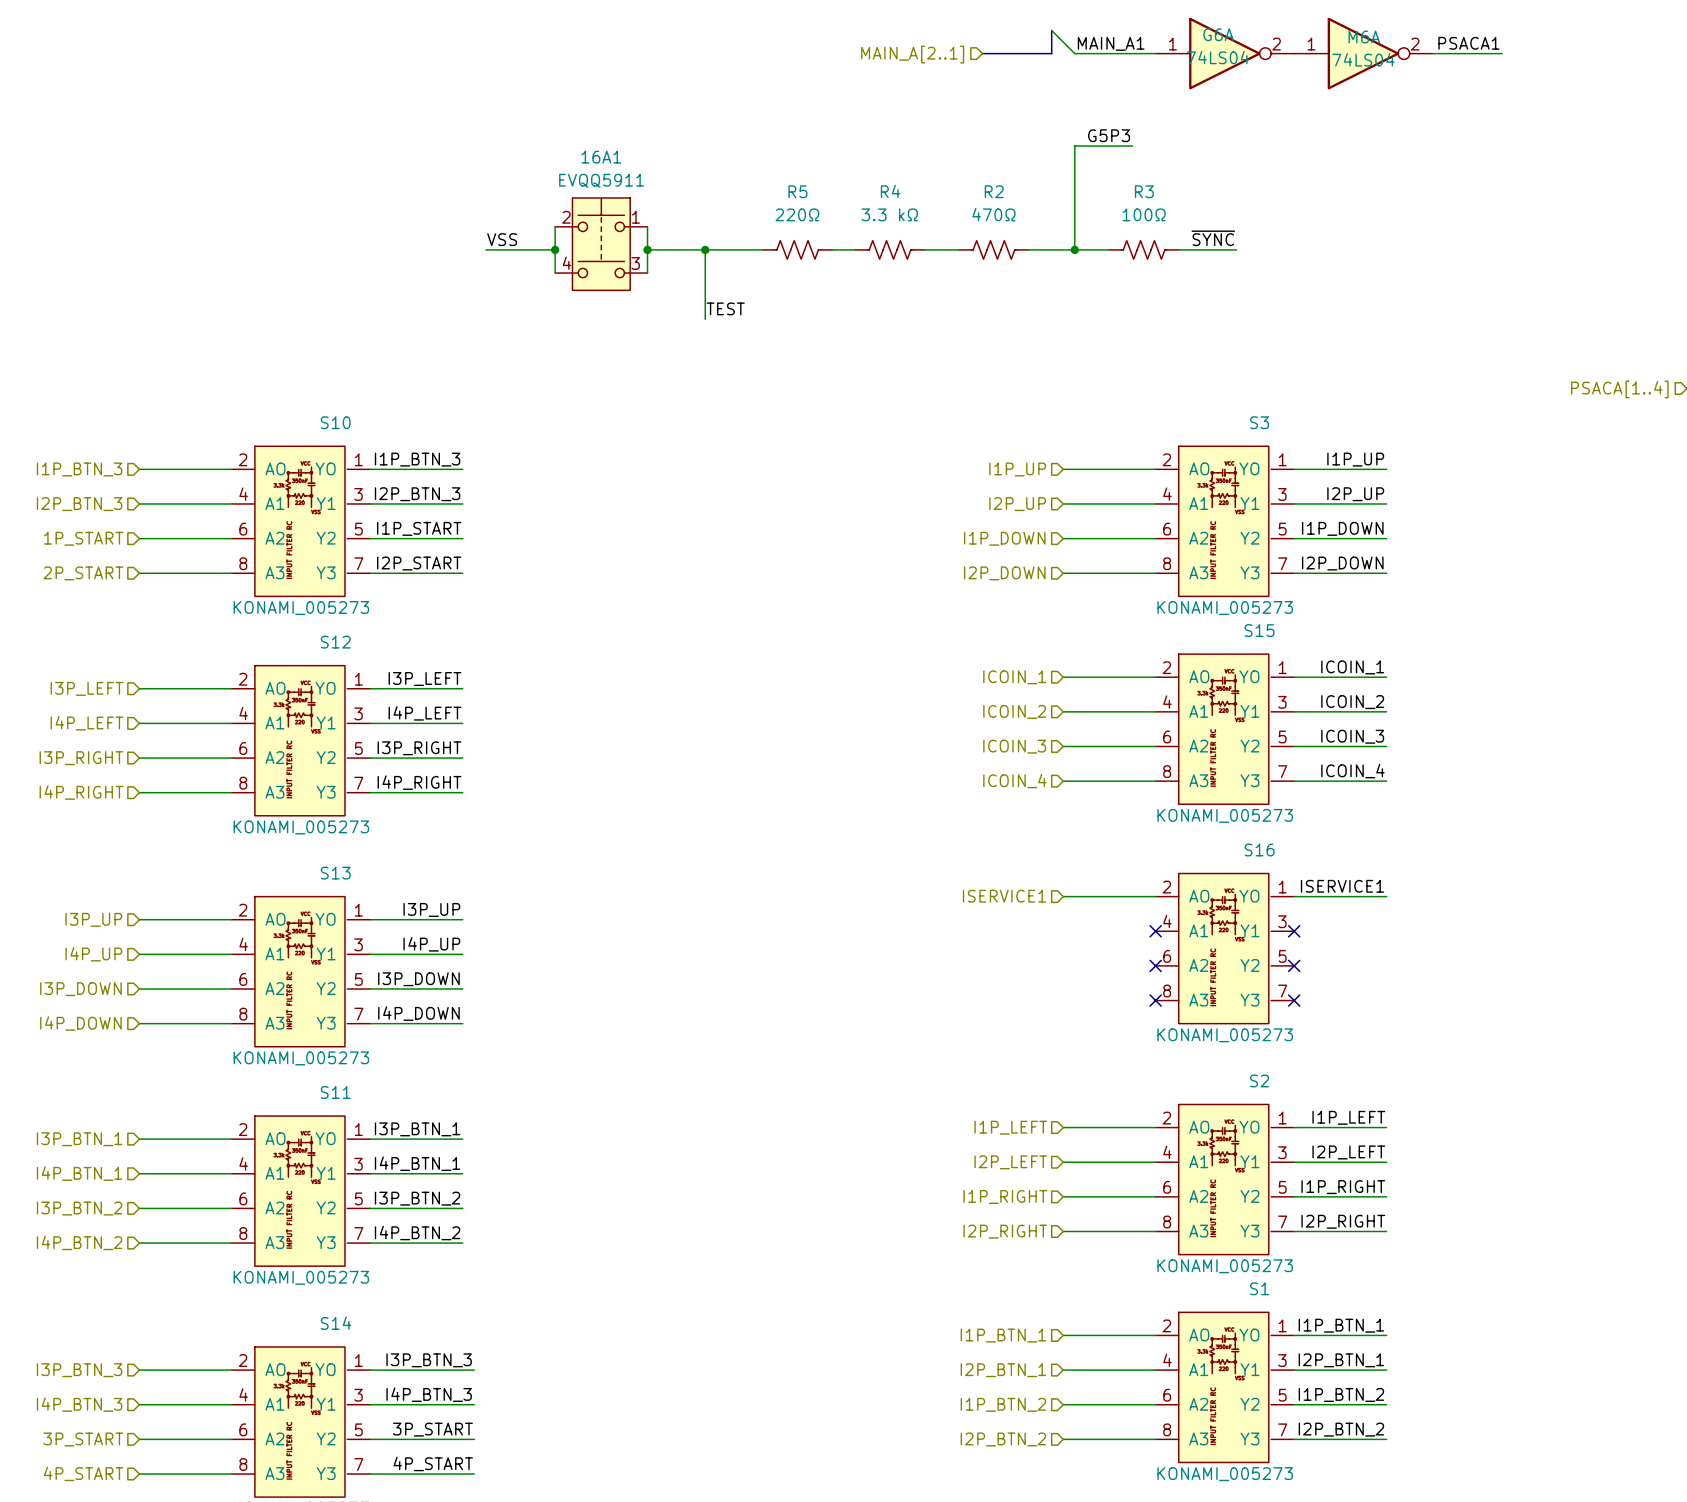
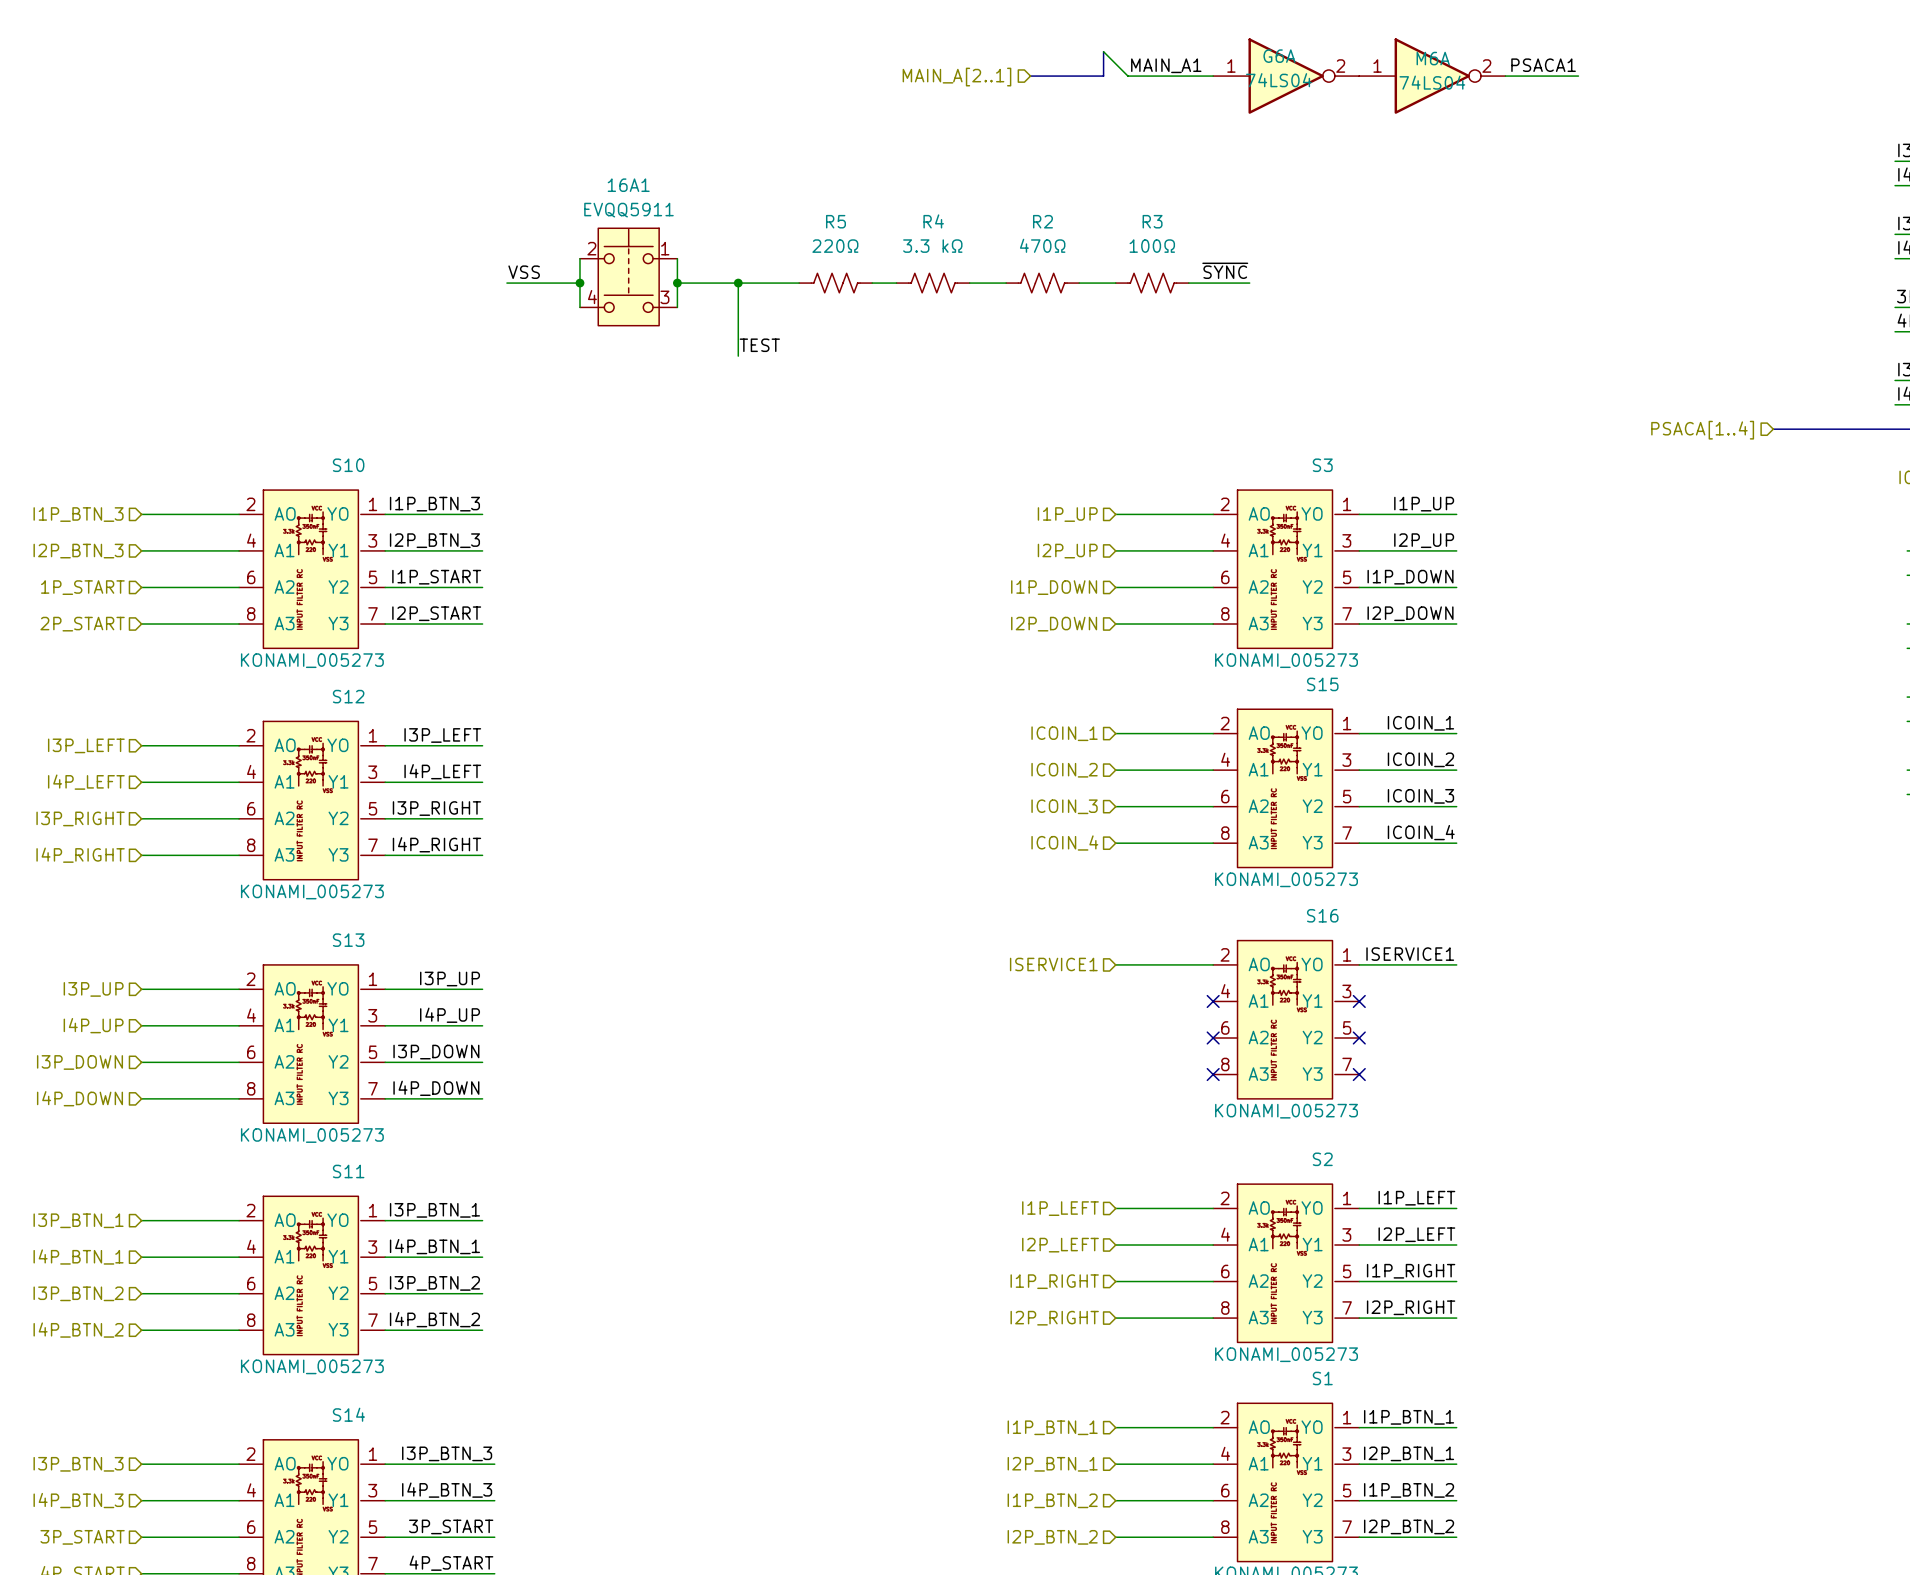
label: G5P3 (1109, 135) -> none
wire: (1132, 146) (1074, 146) (1074, 249) -> none
label position: ~{SYNC} (1213, 238) -> ~{SYNC} (1225, 270)
wire: (1063, 249) (1109, 249) -> none
junction: (1074, 249) -> none
R3 position: (1144, 249) -> (1152, 283)
wire: (1190, 249) (1236, 249) -> (1188, 283) (1237, 283)

